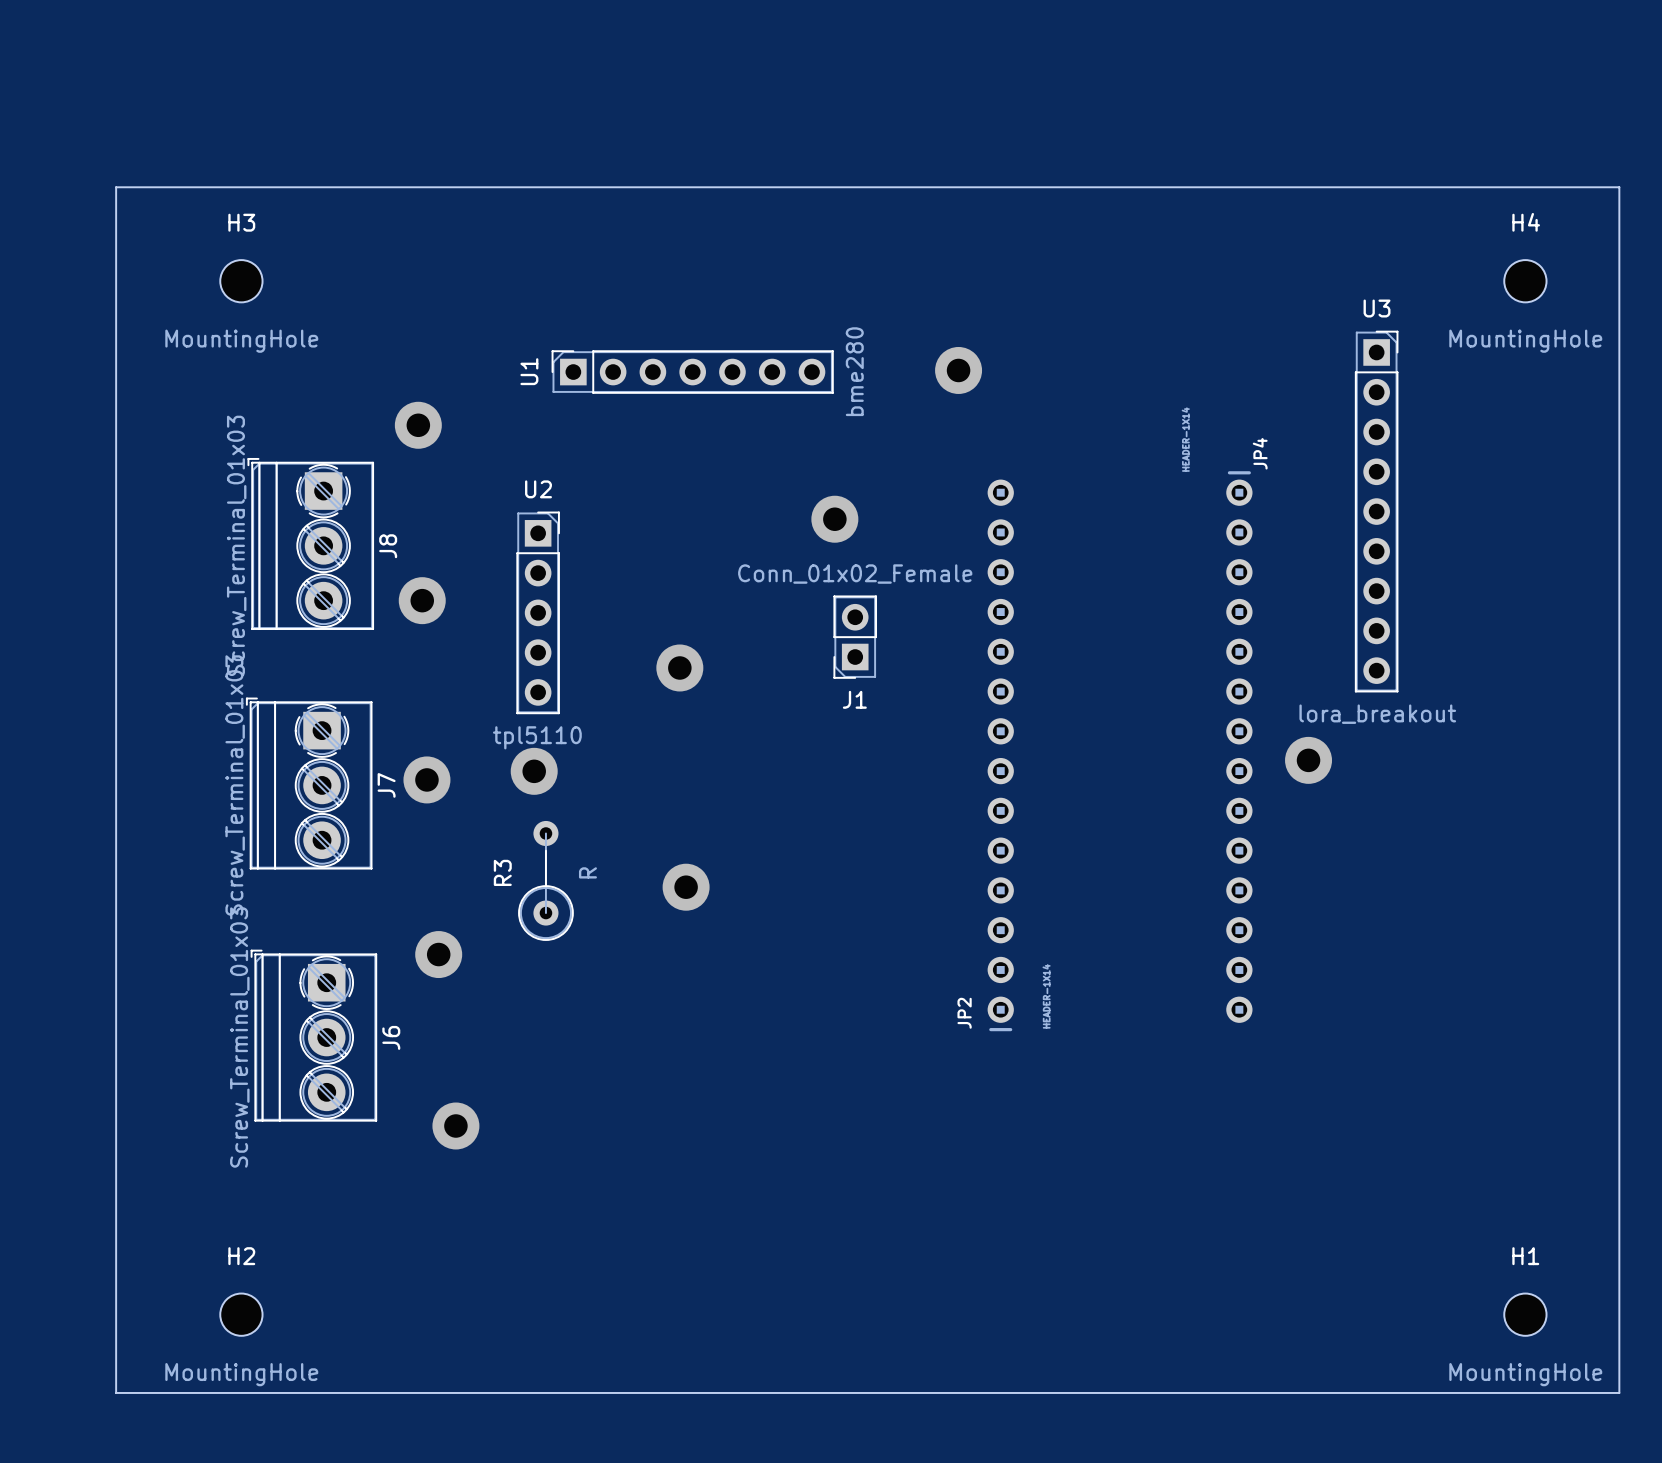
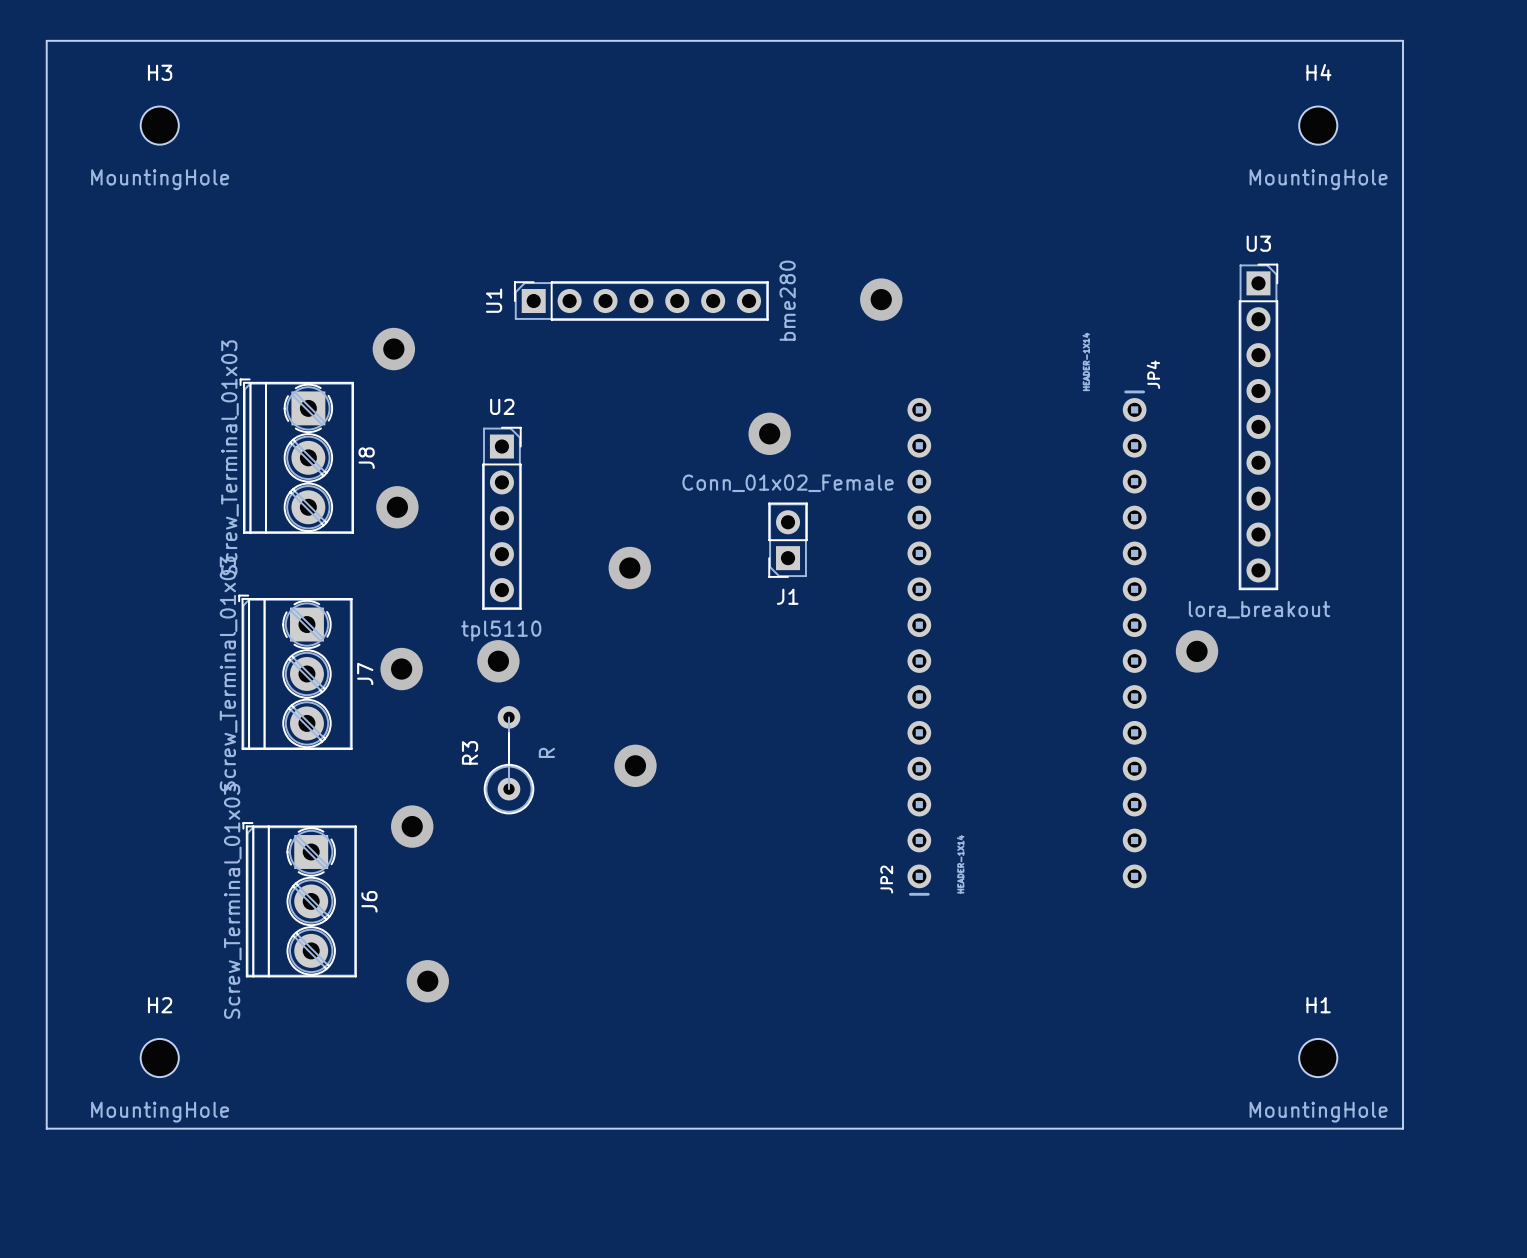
board edge: (116, 187) (1619, 187) (1619, 1392) (116, 1392) (116, 187) -> (46, 40) (46, 1128) (1403, 1128) (1403, 40) (46, 40)
H3 position: (241, 281) -> (159, 125)
H4 position: (1525, 281) -> (1318, 125)
H2 position: (241, 1314) -> (159, 1058)
H1 position: (1525, 1314) -> (1318, 1058)

